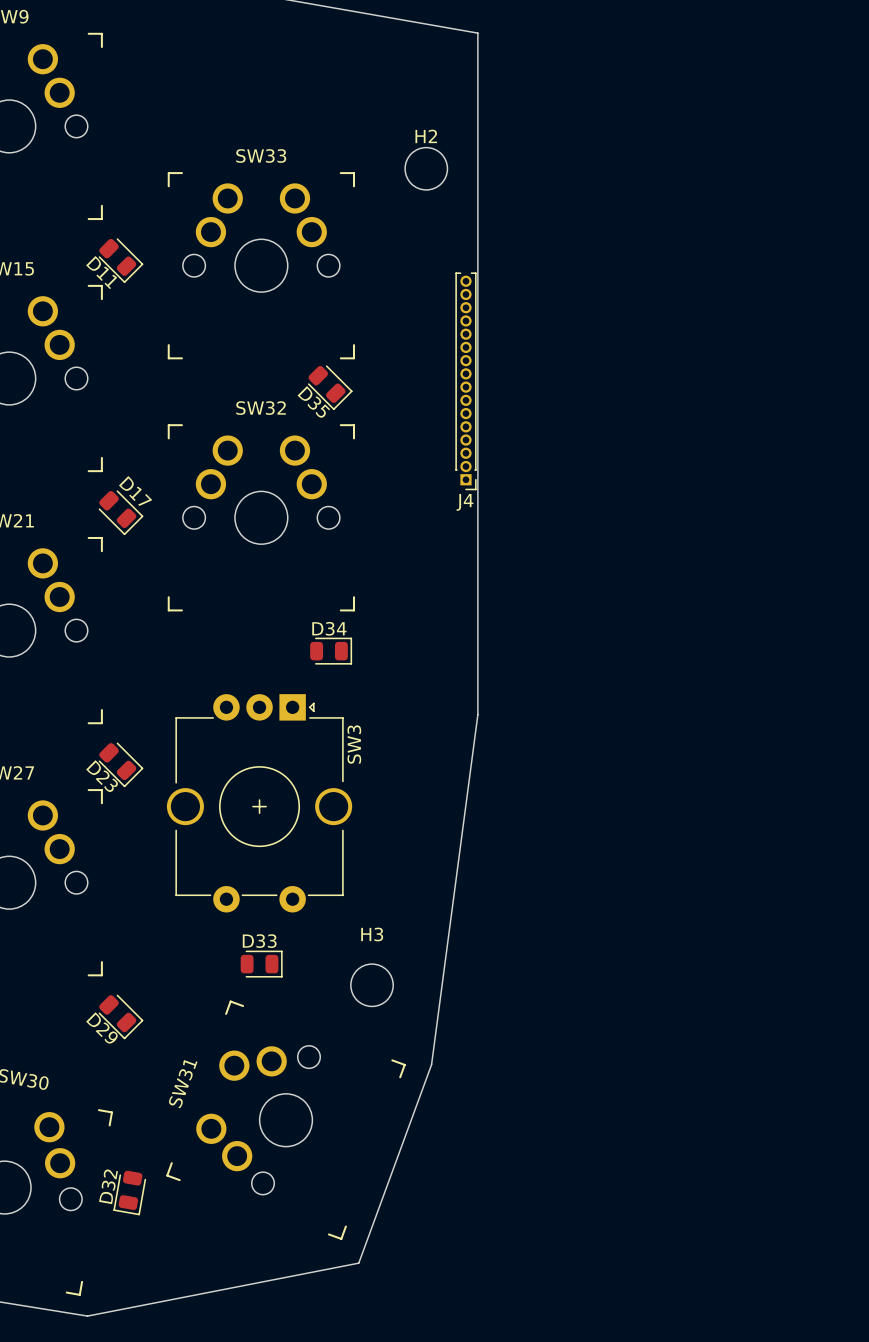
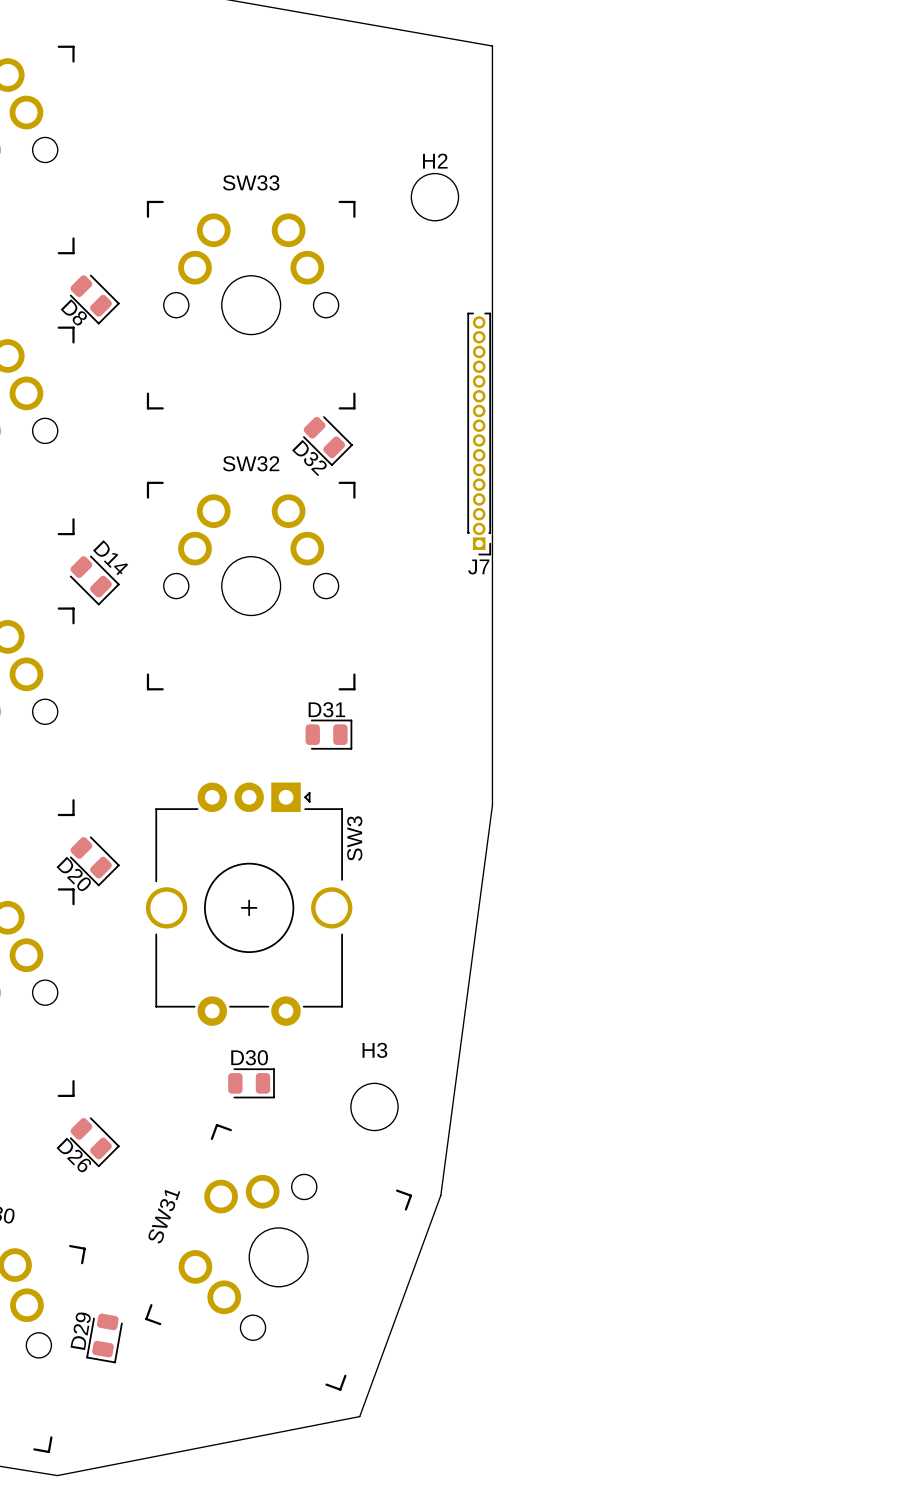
D11 name: D11 (101, 272) -> D8 (73, 312)
D35 name: D35 (313, 401) -> D32 (309, 458)
D17 name: D17 (135, 491) -> D14 (110, 557)
J4 name: J4 (465, 502) -> J7 (478, 566)
D34 name: D34 (329, 628) -> D31 (326, 709)
D23 name: D23 (102, 776) -> D20 (73, 874)
D33 name: D33 (259, 941) -> D30 (249, 1057)
D29 name: D29 (102, 1028) -> D26 (74, 1154)
D32 name: D32 (108, 1186) -> D29 (80, 1331)

